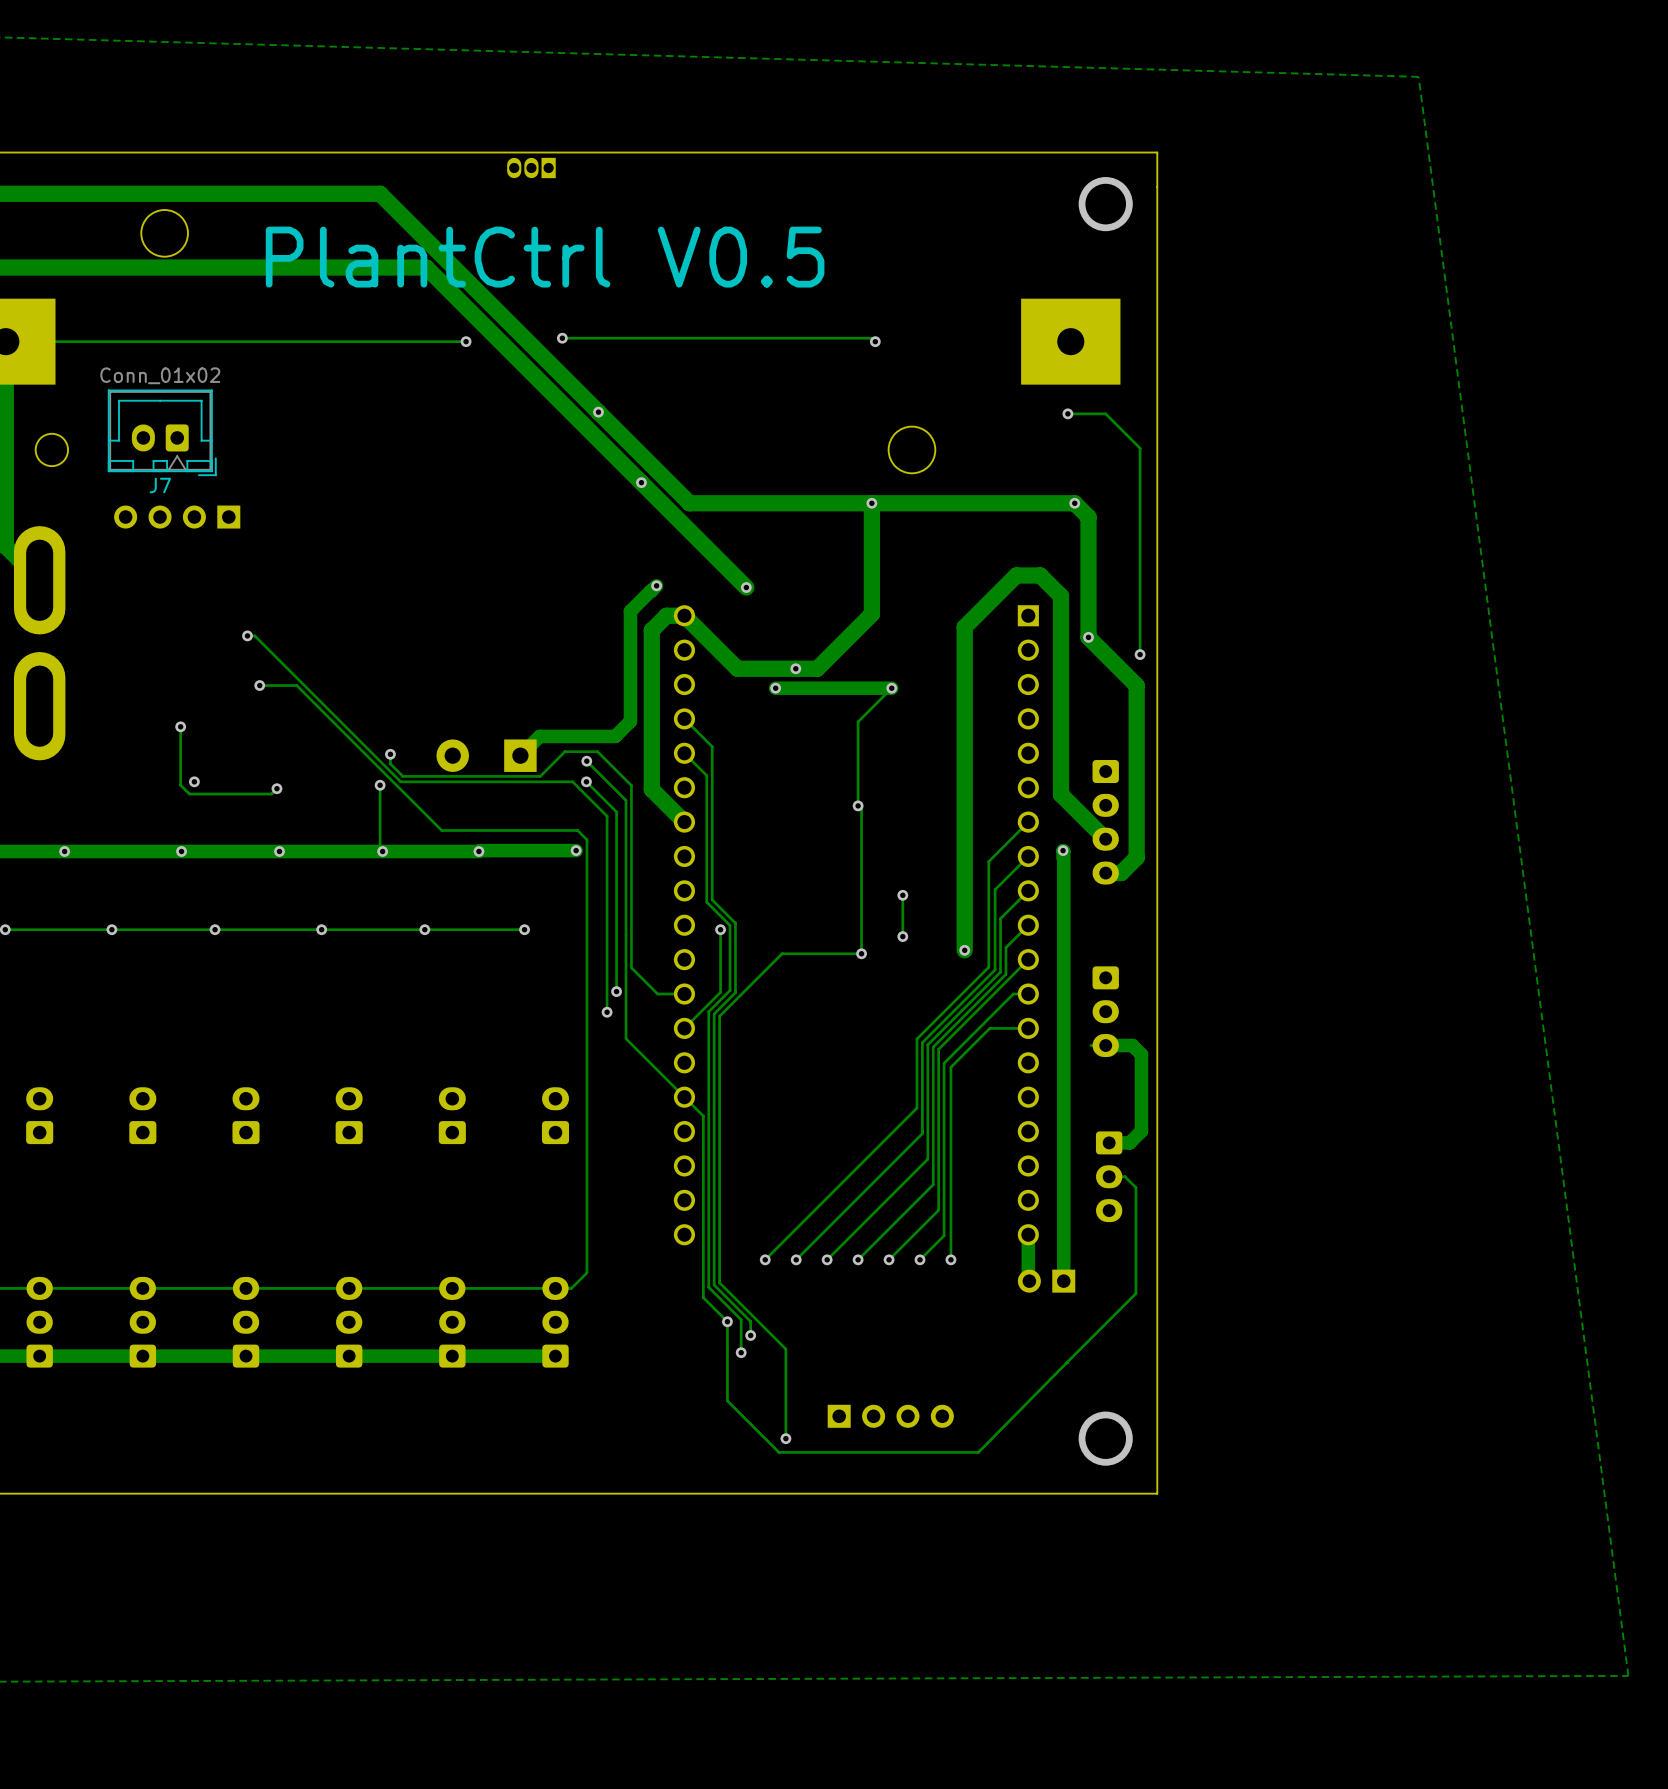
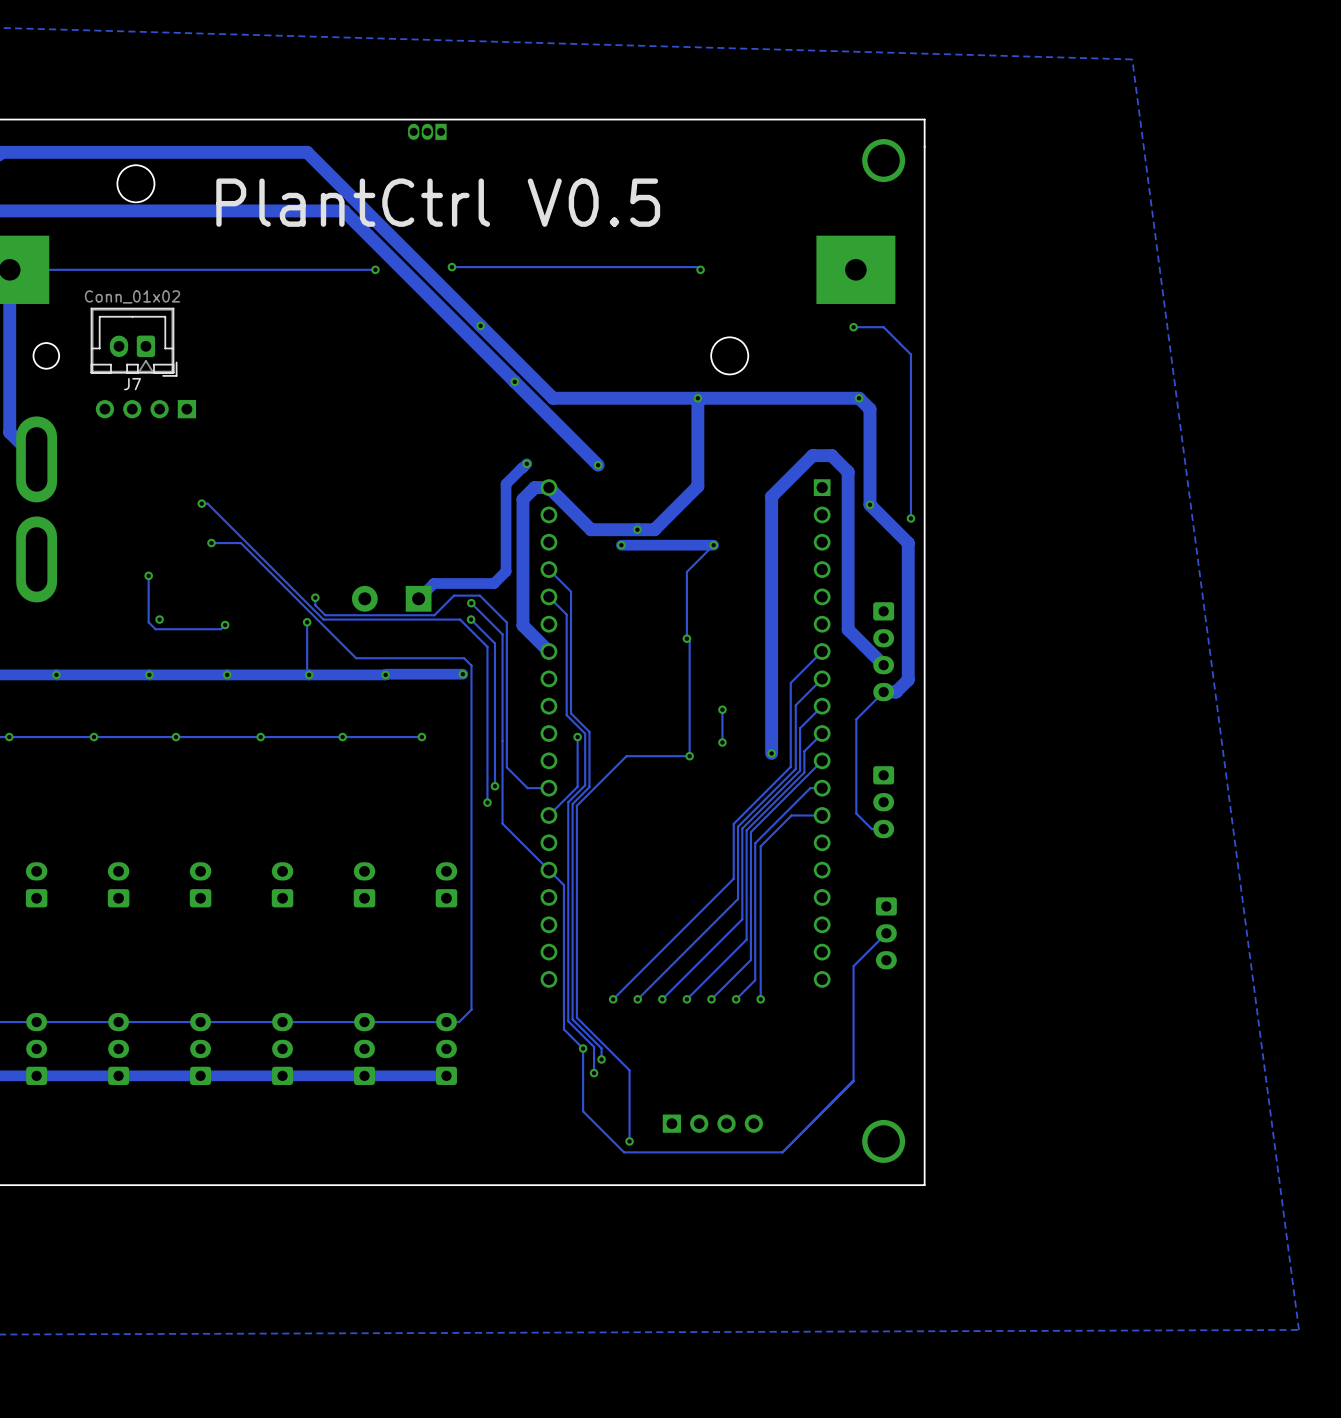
via: (1063, 850) -> none
track: (1063, 858) (1063, 850) (1063, 1281) -> none
track: none -> (883, 692) (856, 719) (856, 813) (871, 829)
track: (1105, 1045) (1132, 1045) (1141, 1054) (1141, 1131) (1129, 1142) (1109, 1142) -> none
track: (1109, 1176) (1125, 1176) (1135, 1187) (1135, 1293) (1066, 1362) -> (886, 933) (853, 966) (853, 1081) (782, 1152)
track: (1028, 1234) (1029, 1281) -> none
part: (1046, 1281) -> none

